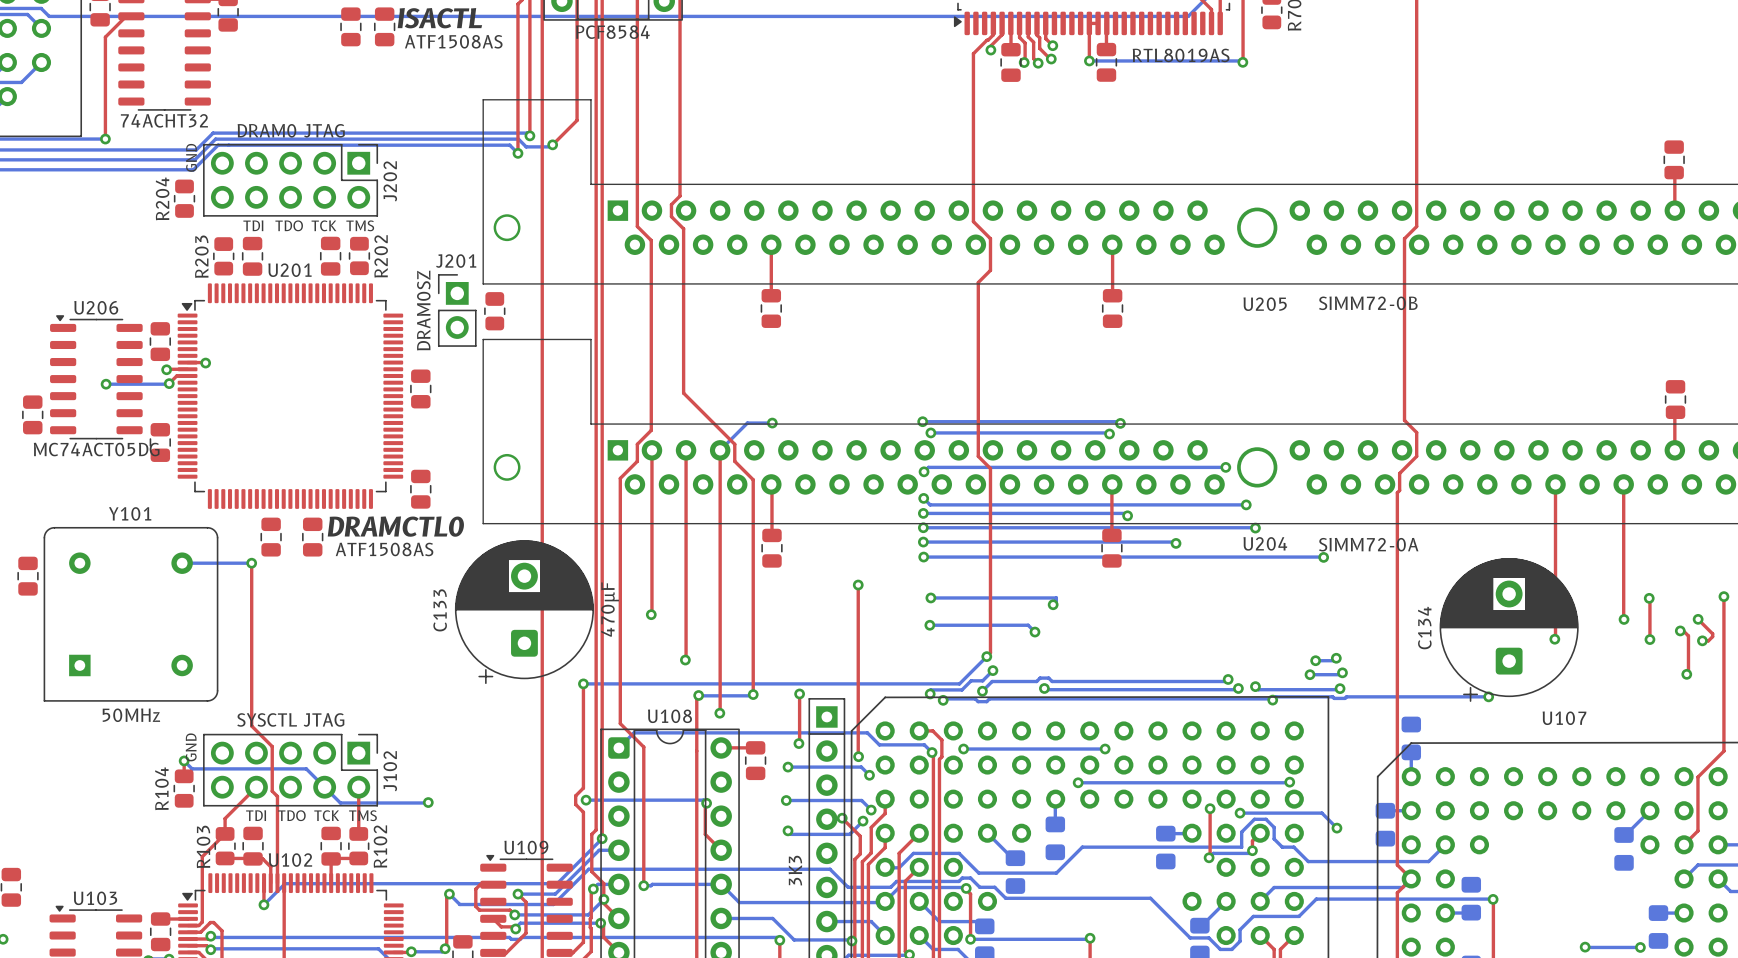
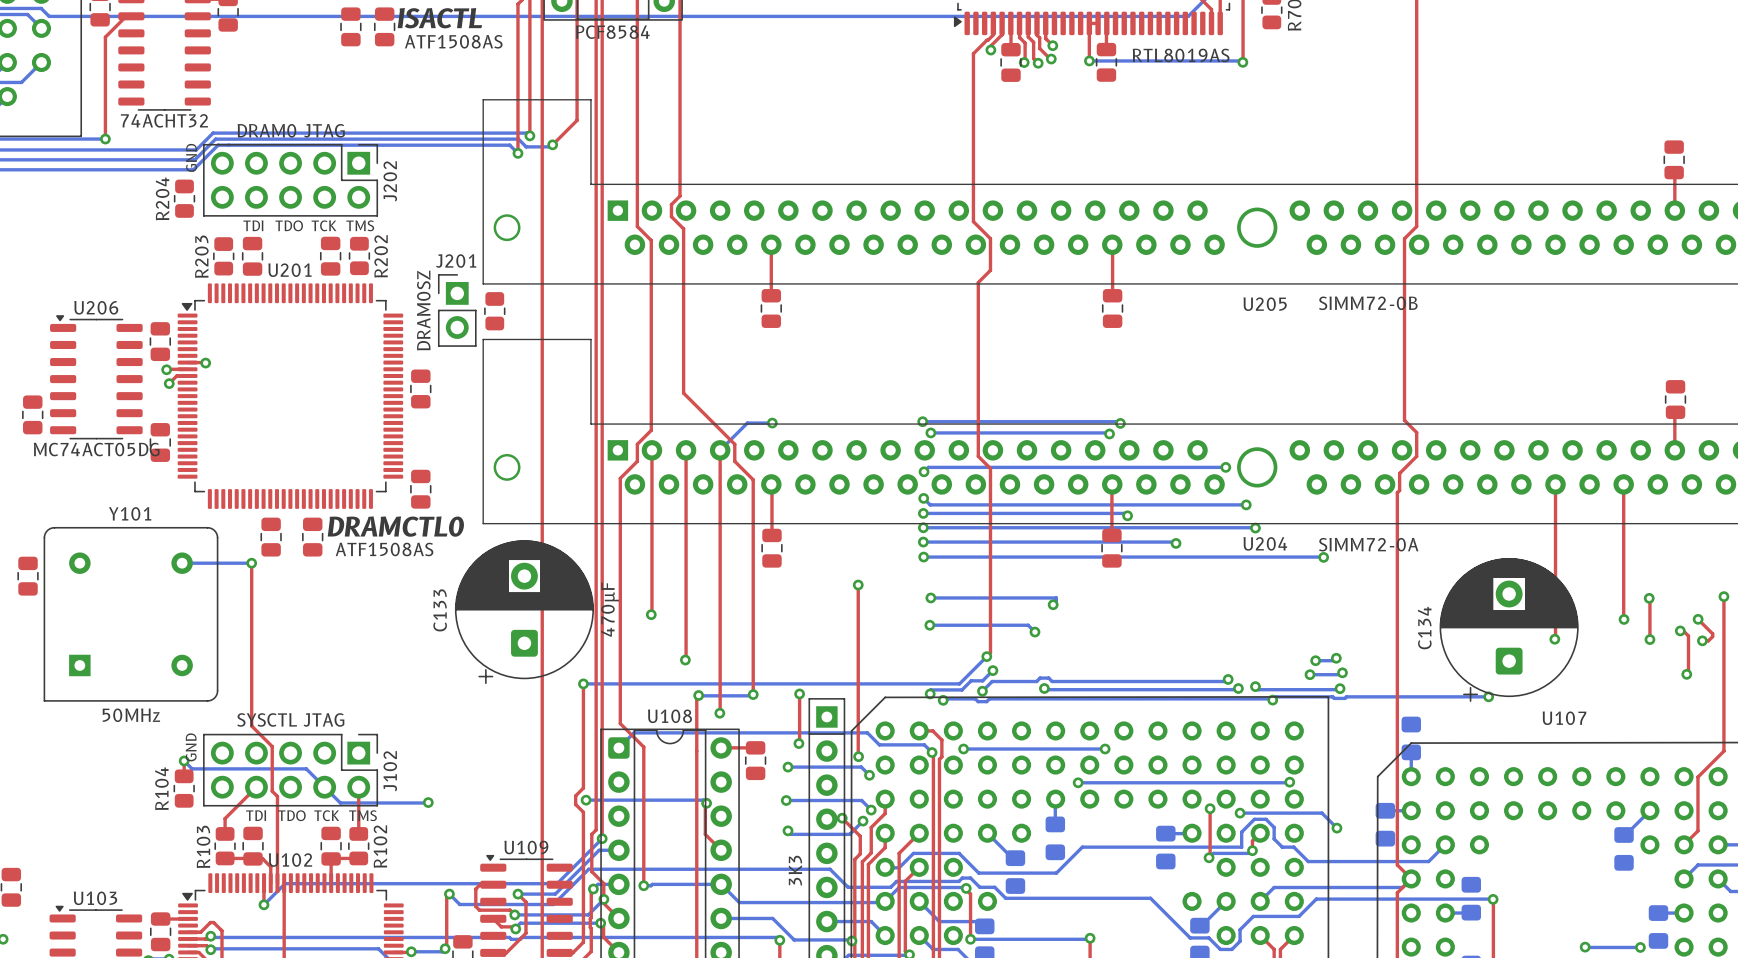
bottom track: (169, 383) (106, 384) -> none
via: (106, 384) -> none
top track: (225, 833) (202, 856) (202, 922) (198, 925) (188, 925) -> none

